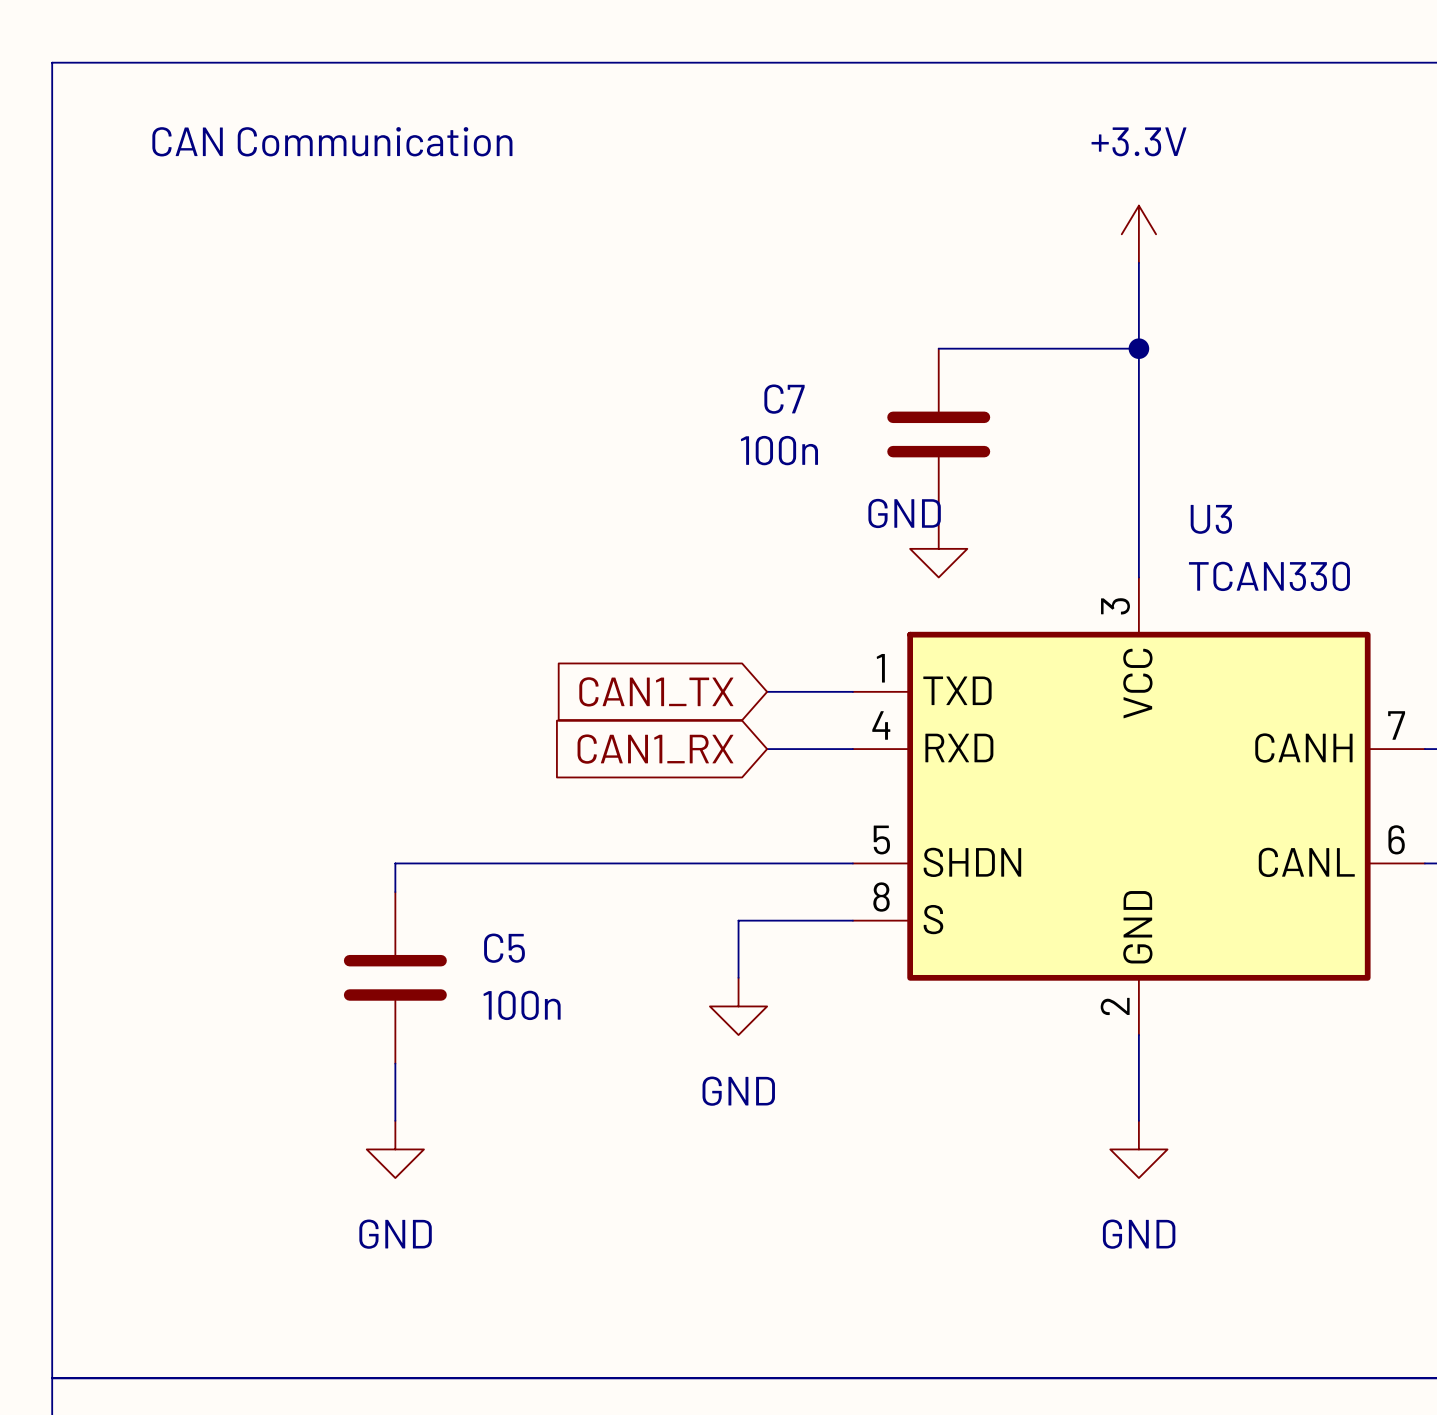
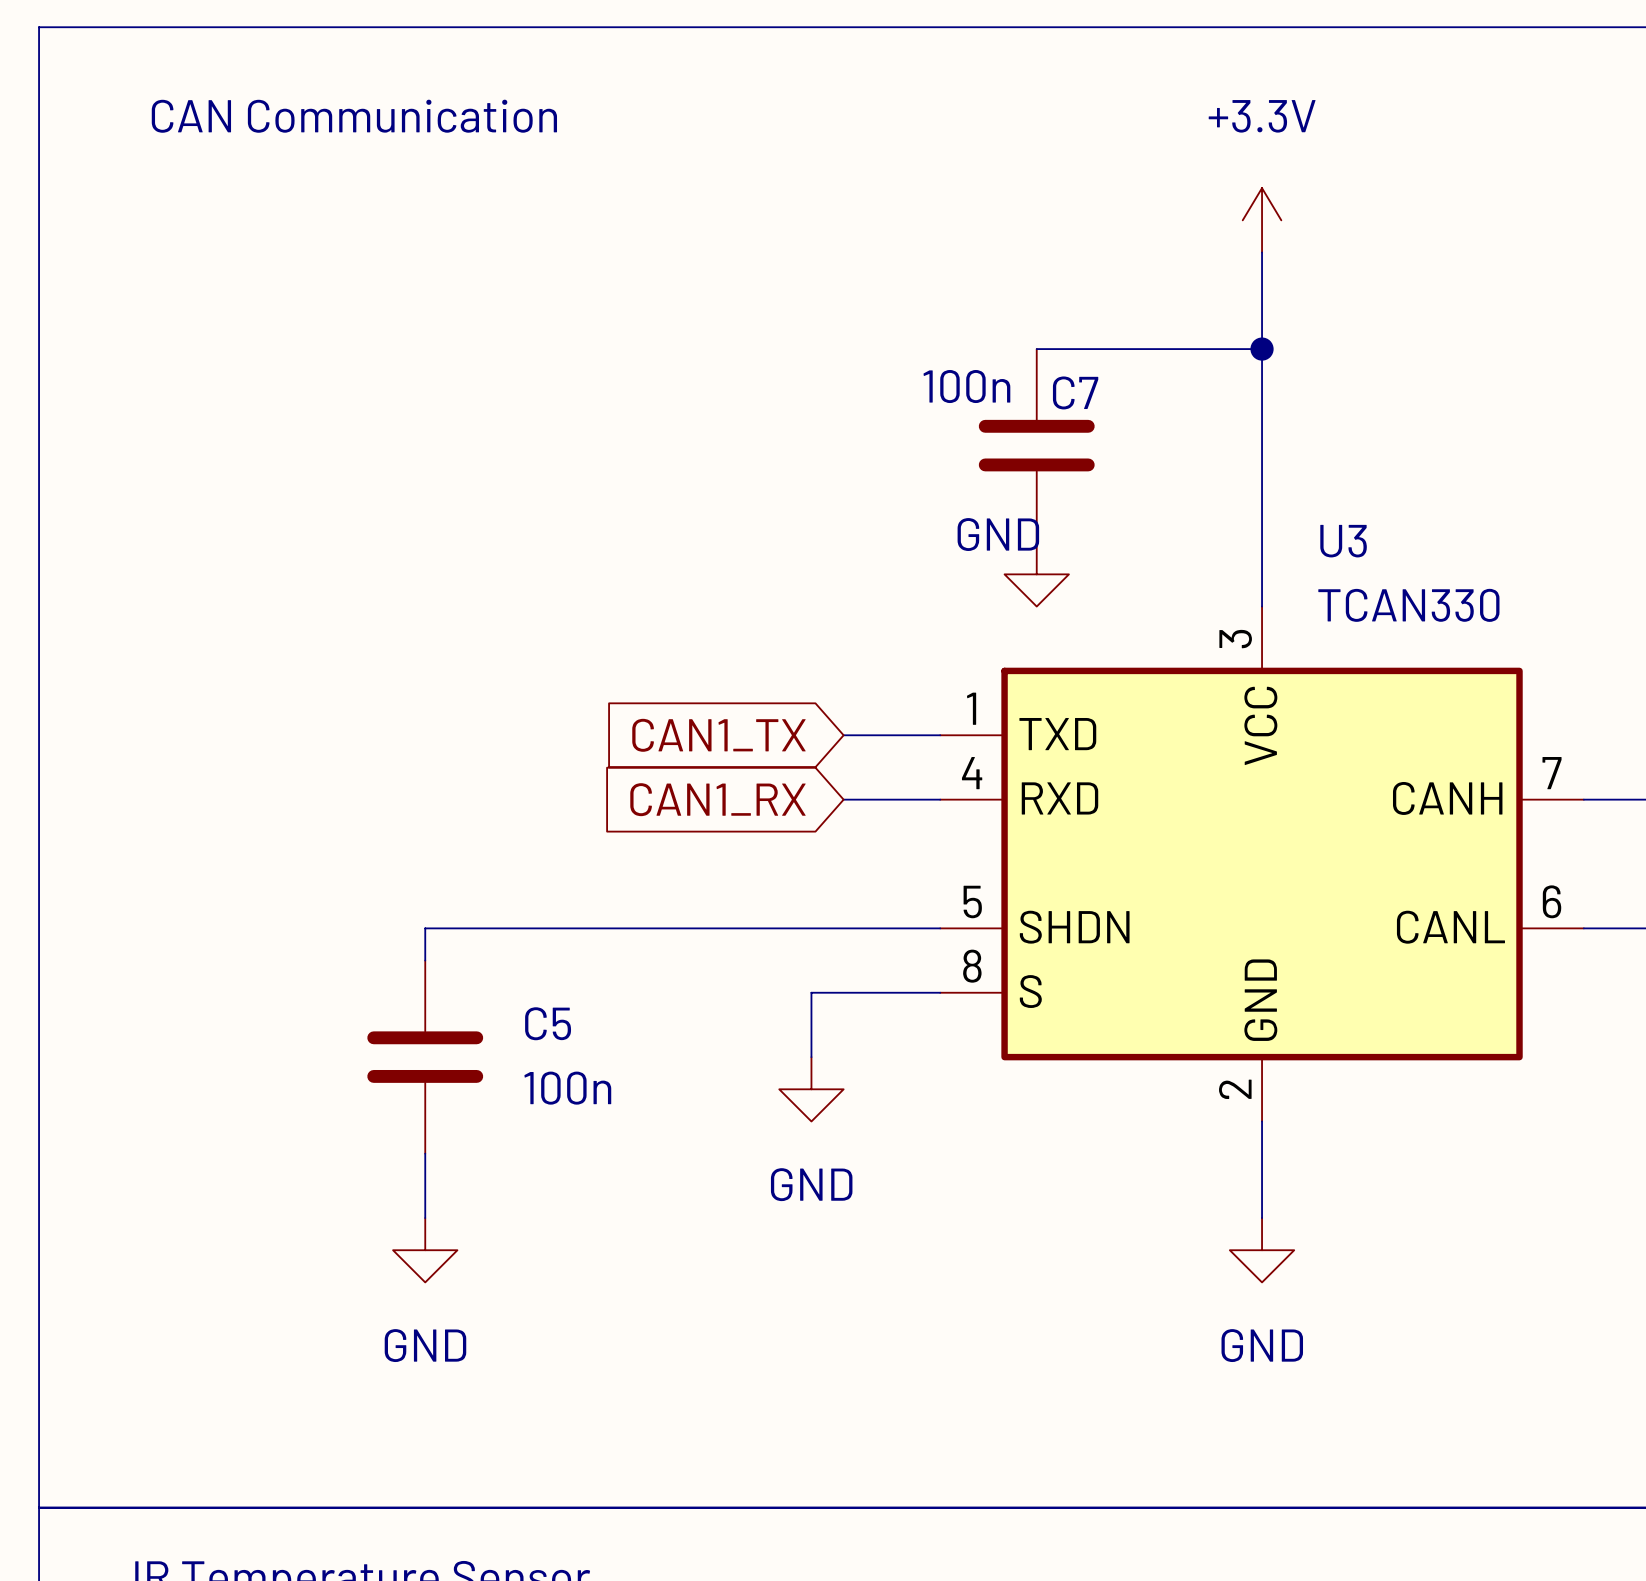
C7 name position: C7 (784, 399) -> C7 (1075, 392)
C7 value position: 100n (779, 450) -> 100n (966, 386)

